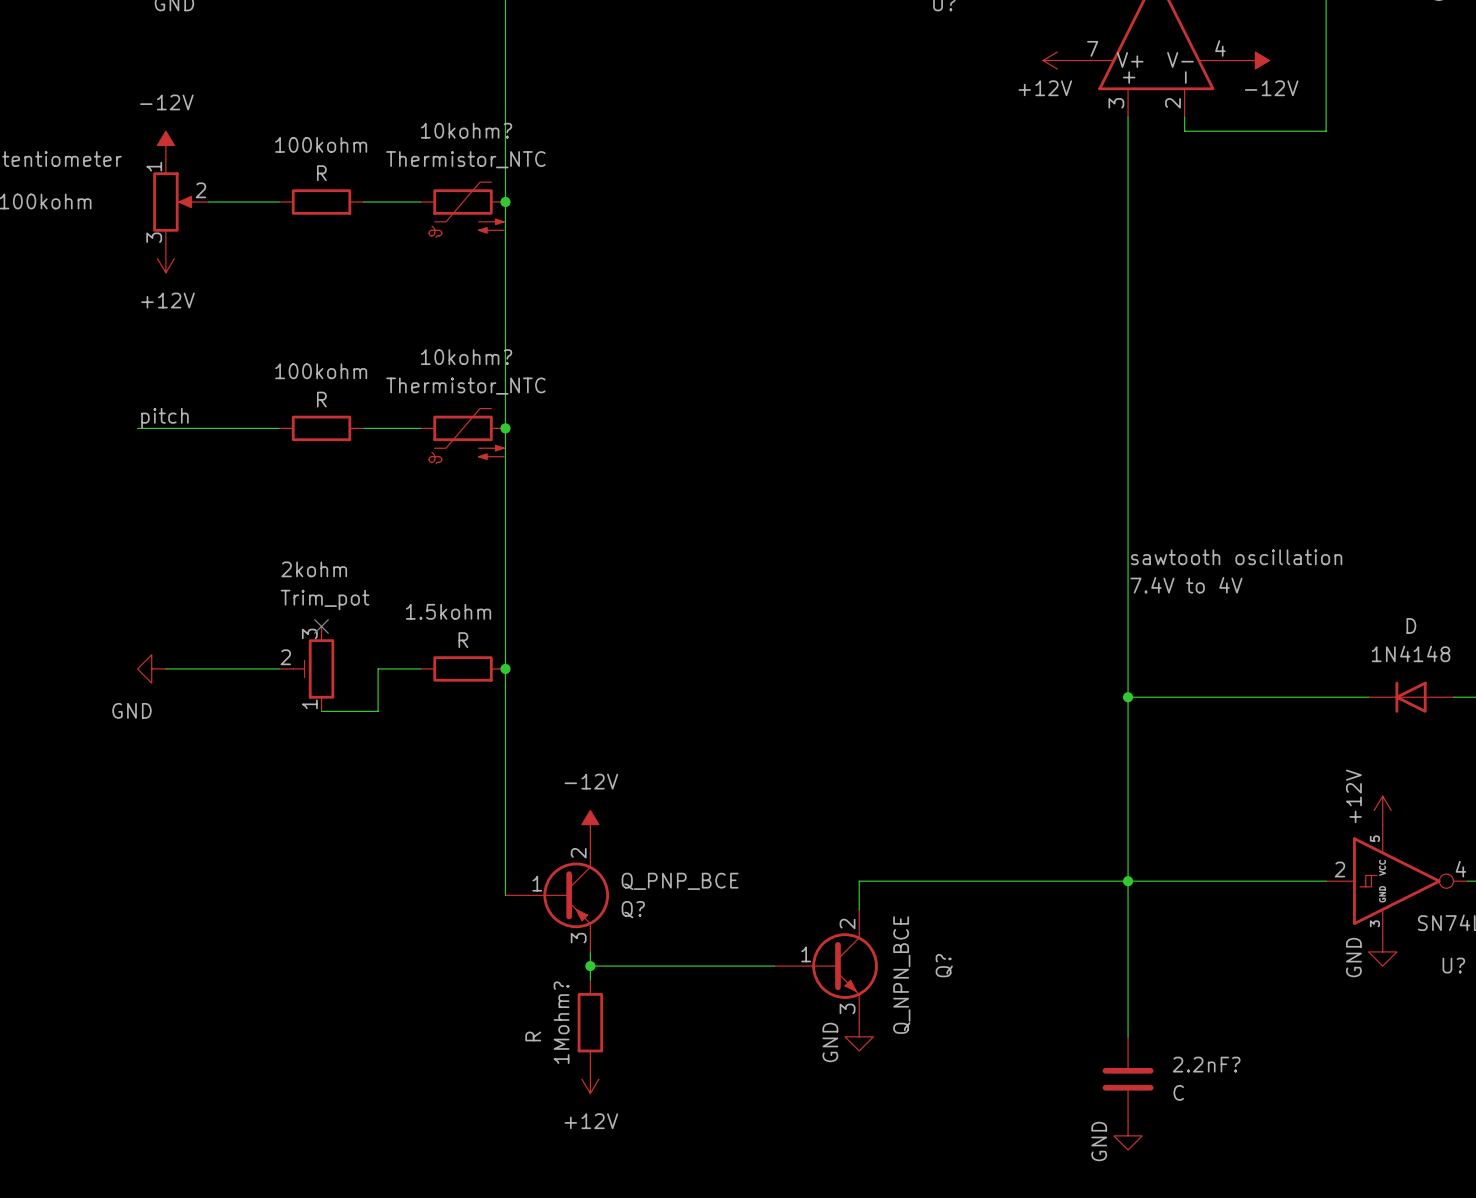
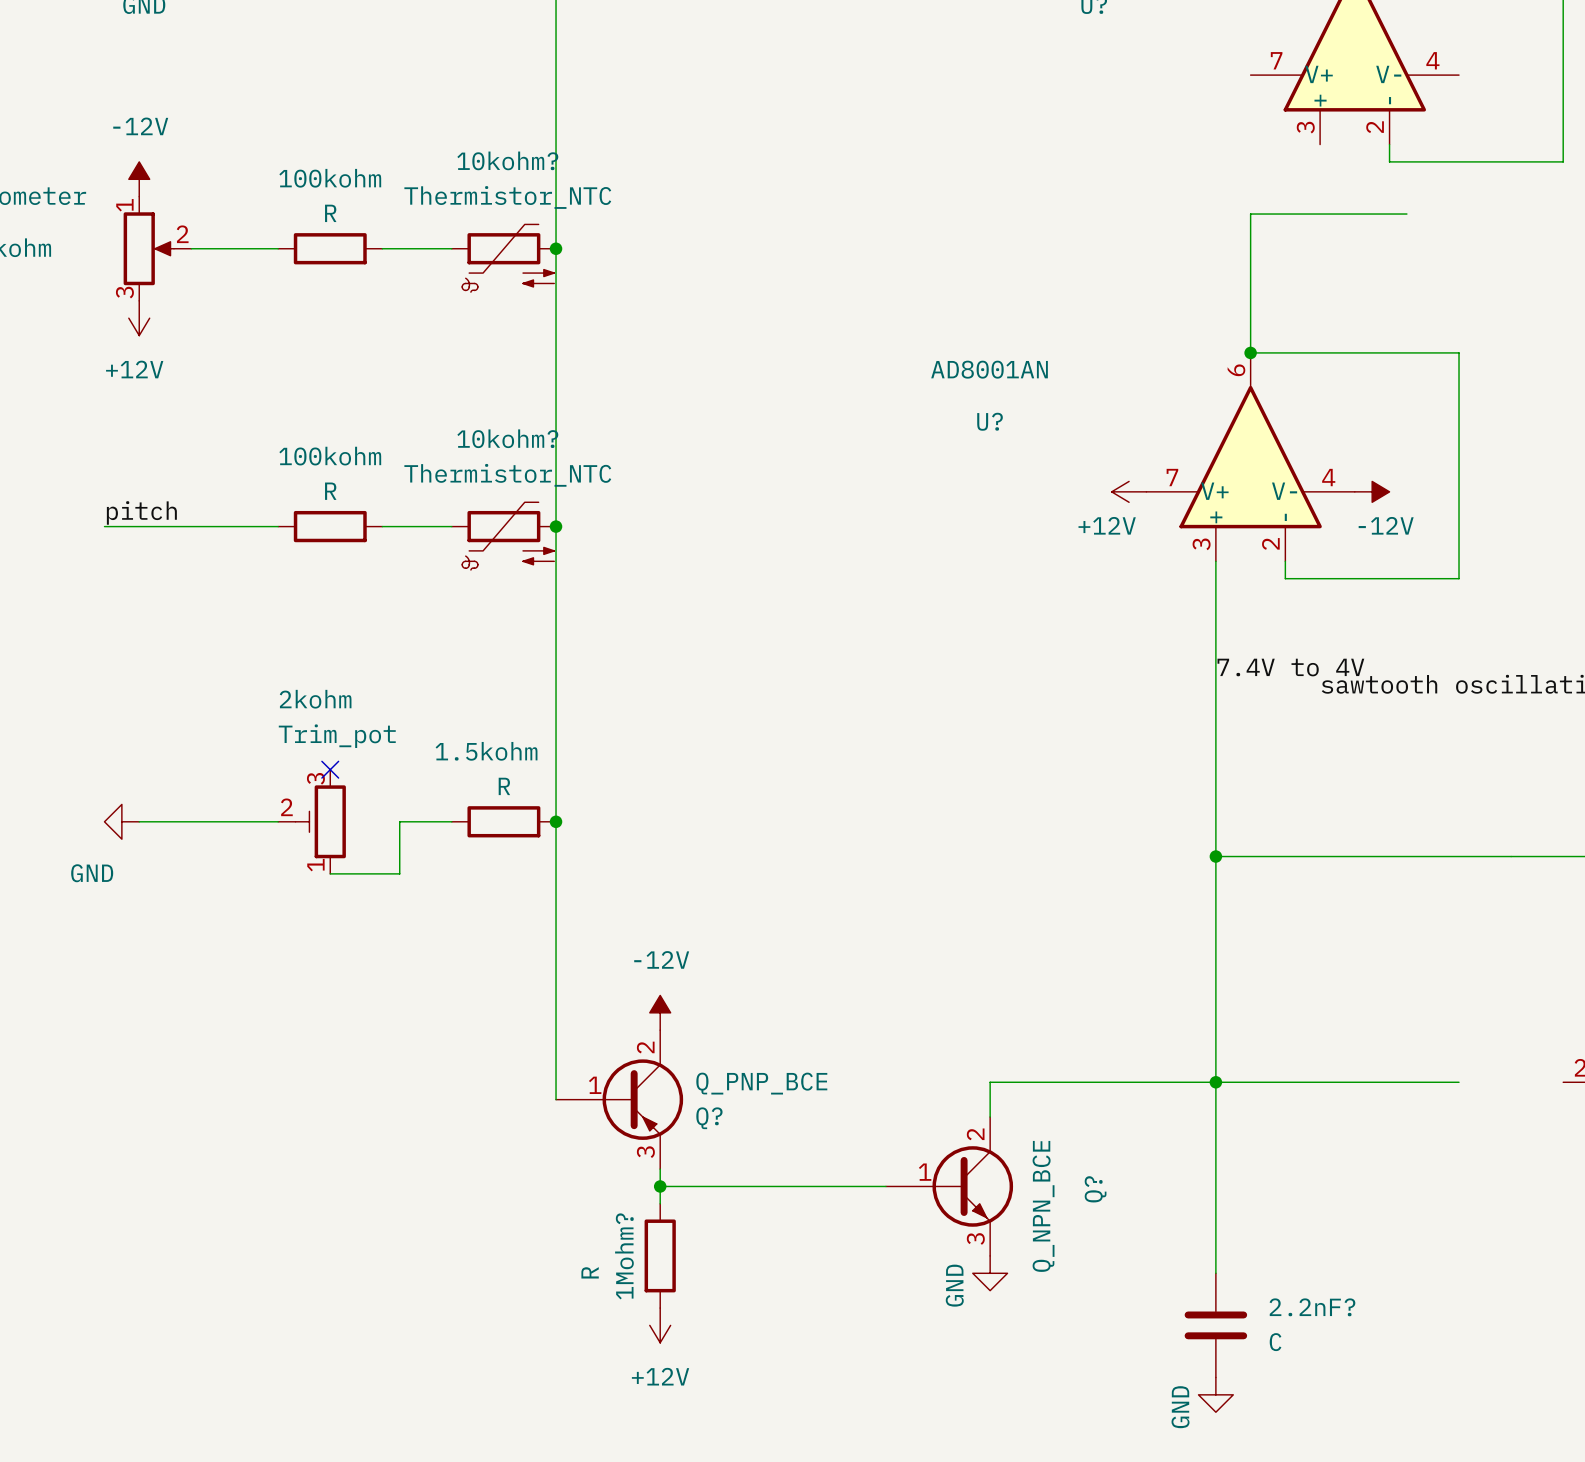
power symbol: +12V (1057, 60) -> none
power symbol: -12V (1255, 60) -> none
wire: (1128, 117) (1128, 1036) -> none
wire: none -> (1406, 214) (1250, 214) (1250, 352) (1459, 352) (1459, 578) (1285, 578) (1285, 561)
junction: none -> (1250, 352)
U?: none -> AD8001AN (1250, 457)
power symbol: none -> +12V (1129, 491)
power symbol: none -> -12V (1372, 491)
wire: none -> (1215, 561) (1215, 1273)
label position: 7.4V to 4V (1186, 585) -> 7.4V to 4V (1290, 667)
junction: none -> (1215, 856)
junction: (1128, 697) -> none
junction: none -> (1215, 1082)
junction: (1128, 881) -> none
wire: (1241, 881) (1326, 881) -> (1215, 856) (1320, 856)
2.2nF? position: (1128, 1079) -> (1215, 1325)
power symbol position: GND (1128, 1135) -> GND (1215, 1394)

